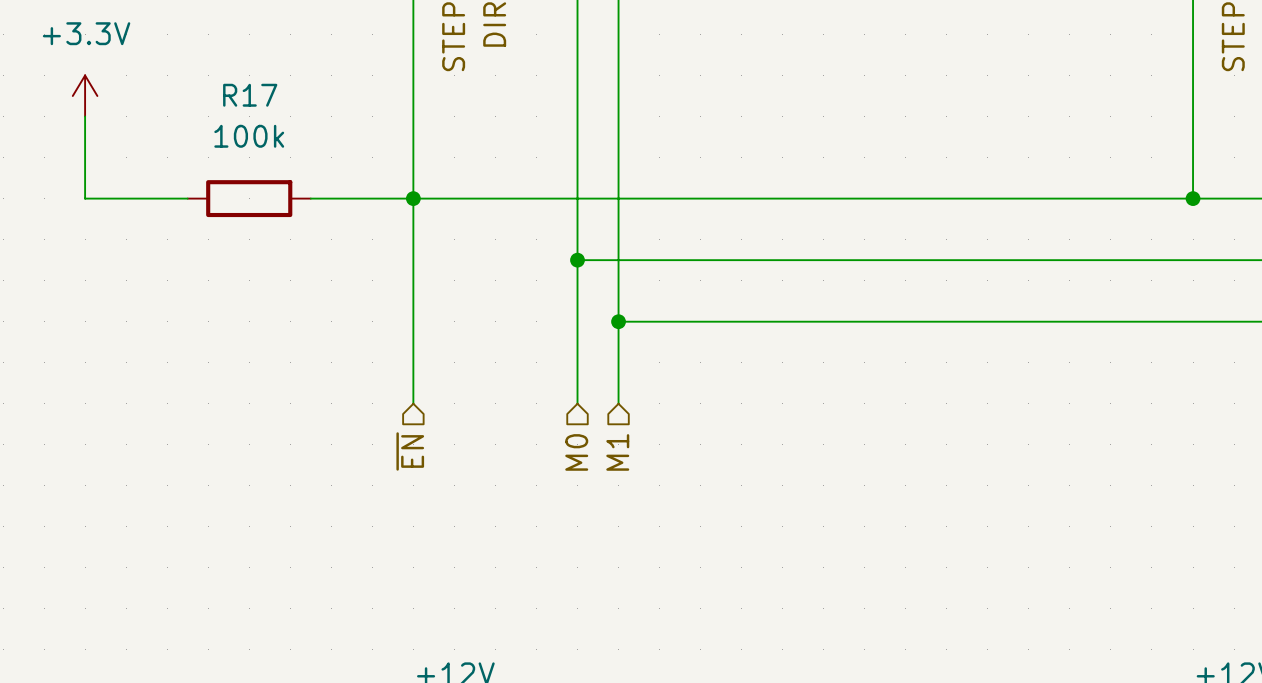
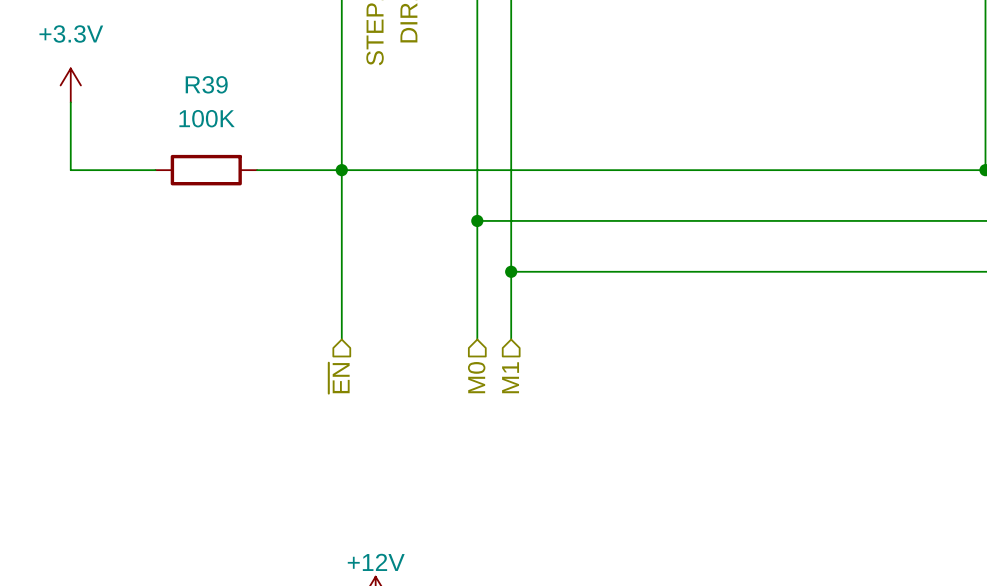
R17 name: R17 (250, 95) -> R39 (206, 84)
R17 value: 100k (249, 136) -> 100K (207, 118)

